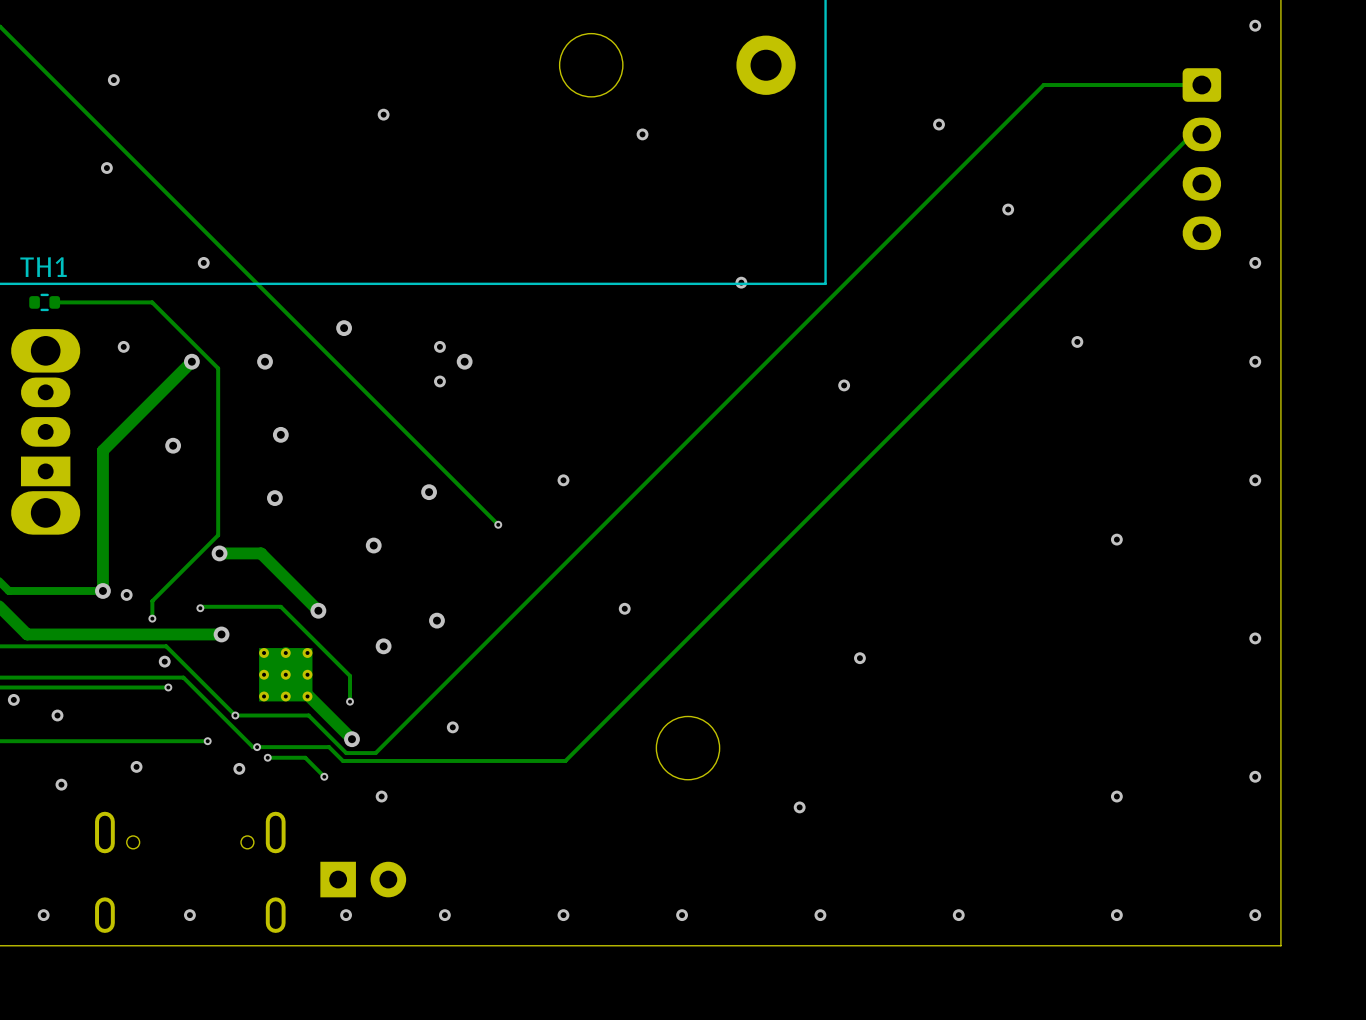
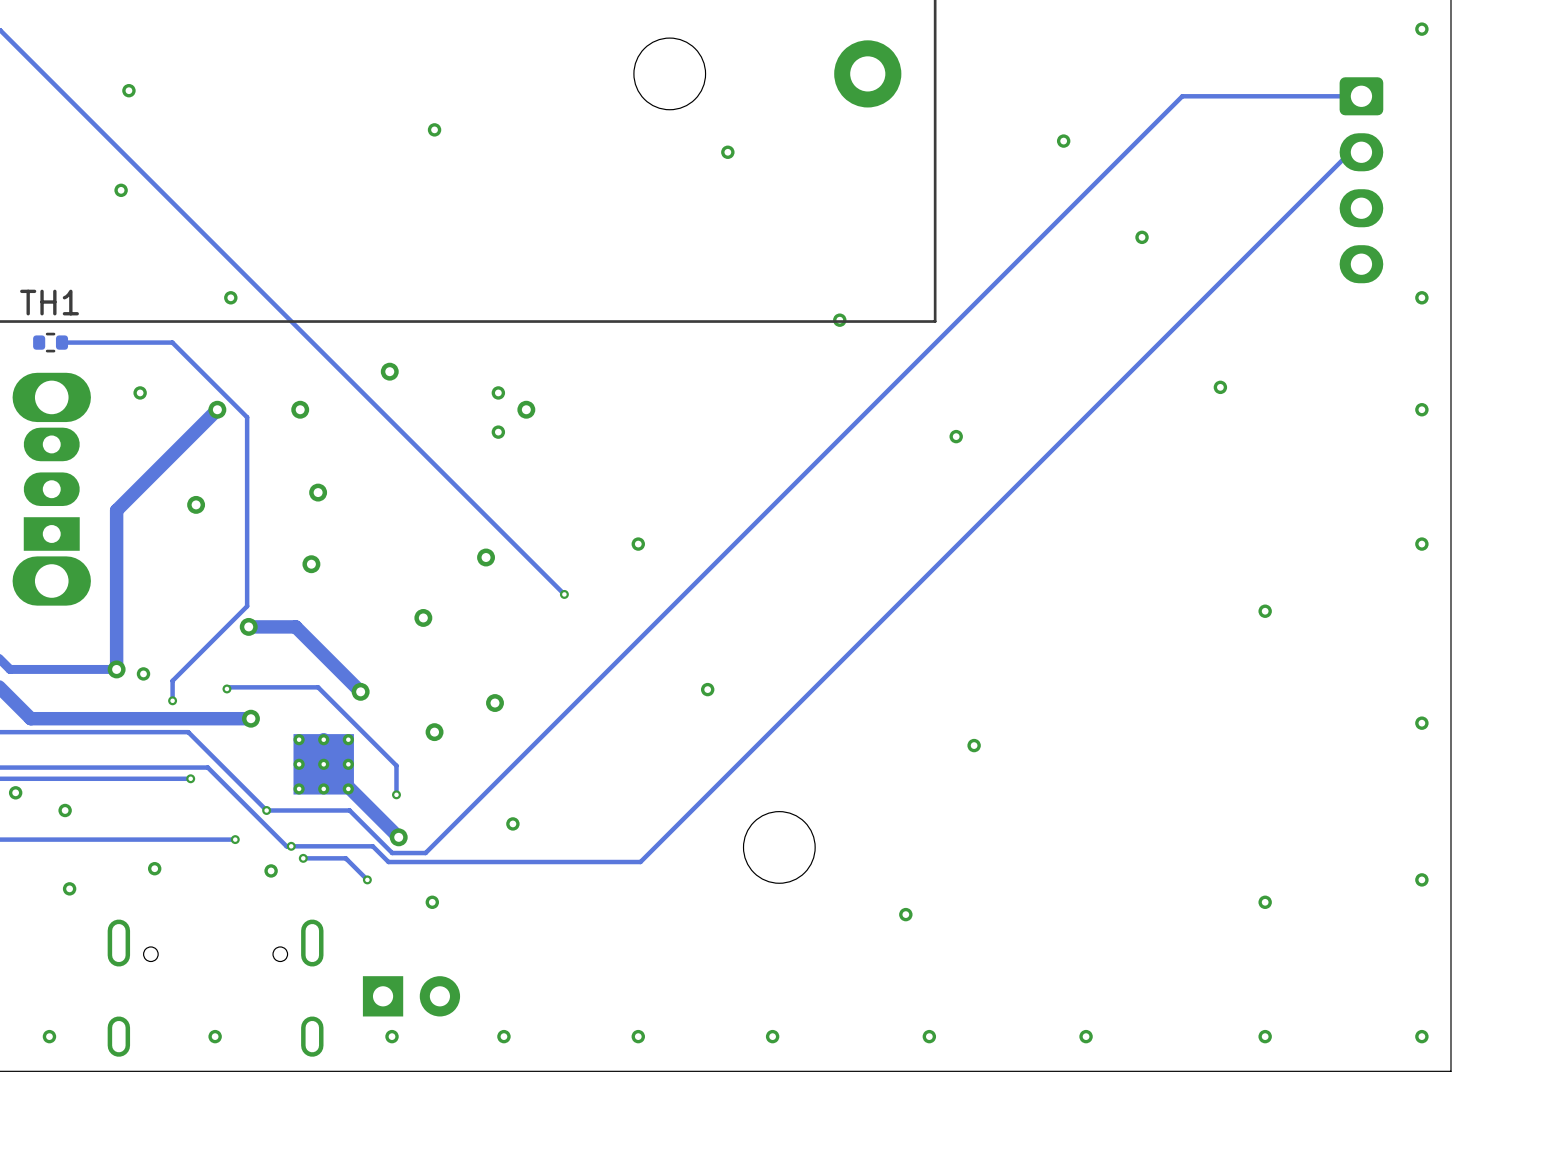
via: (164, 661) -> none

